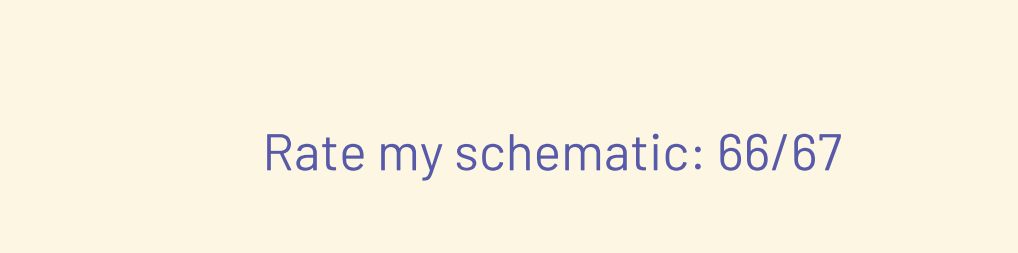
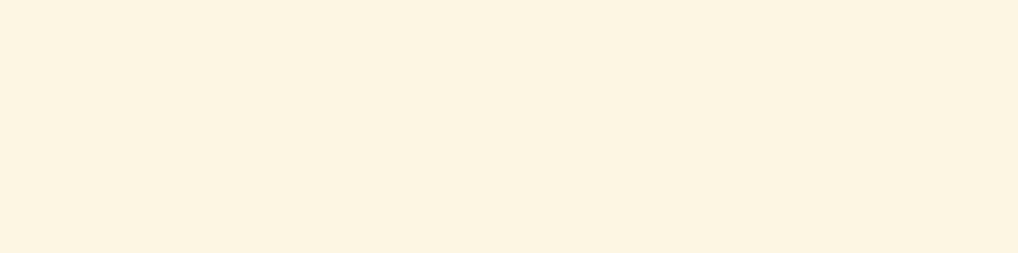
text: Rate my schematic: 66/67 (554, 157) -> none

